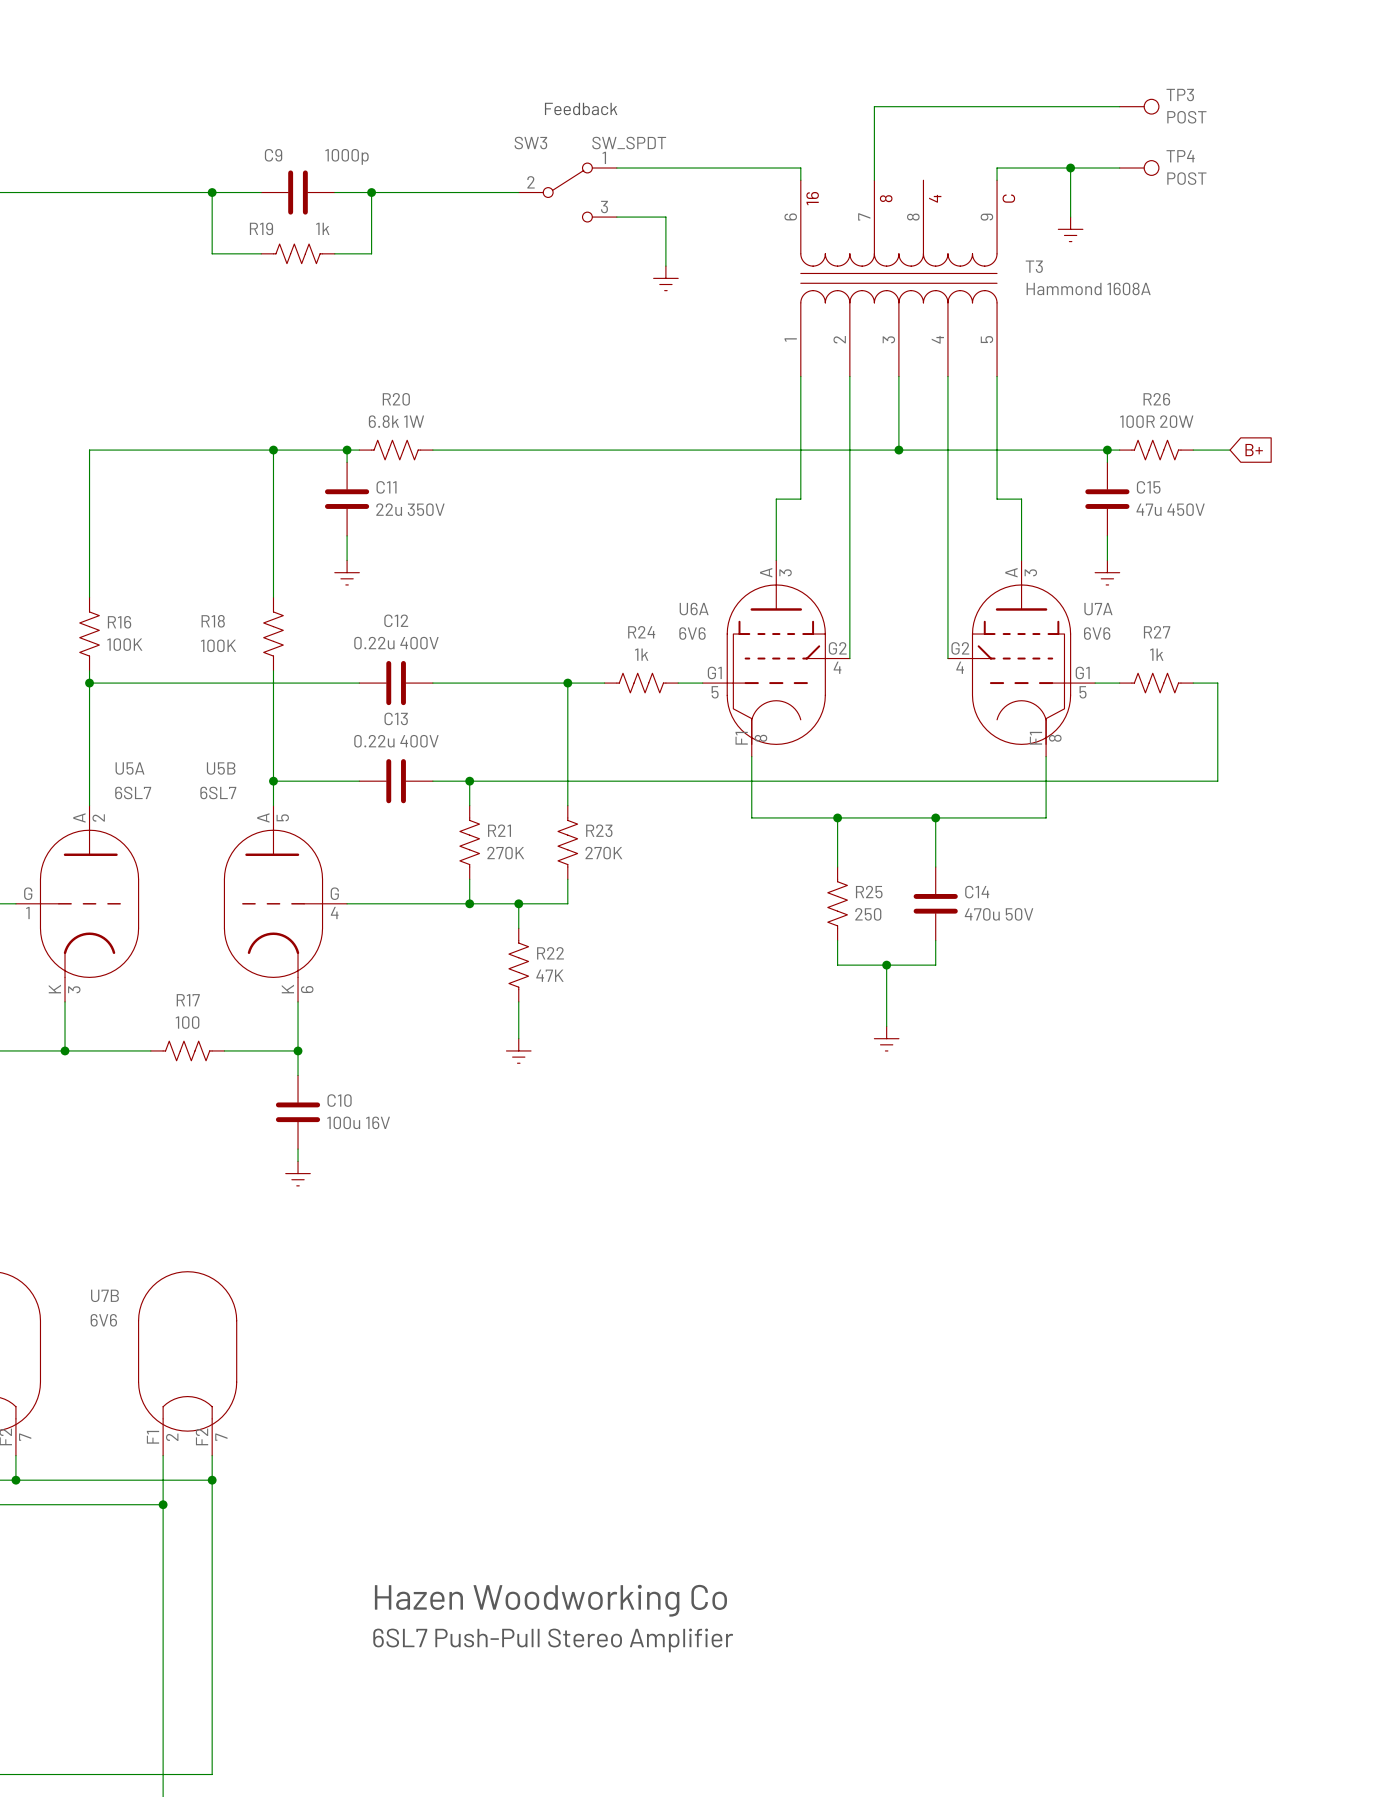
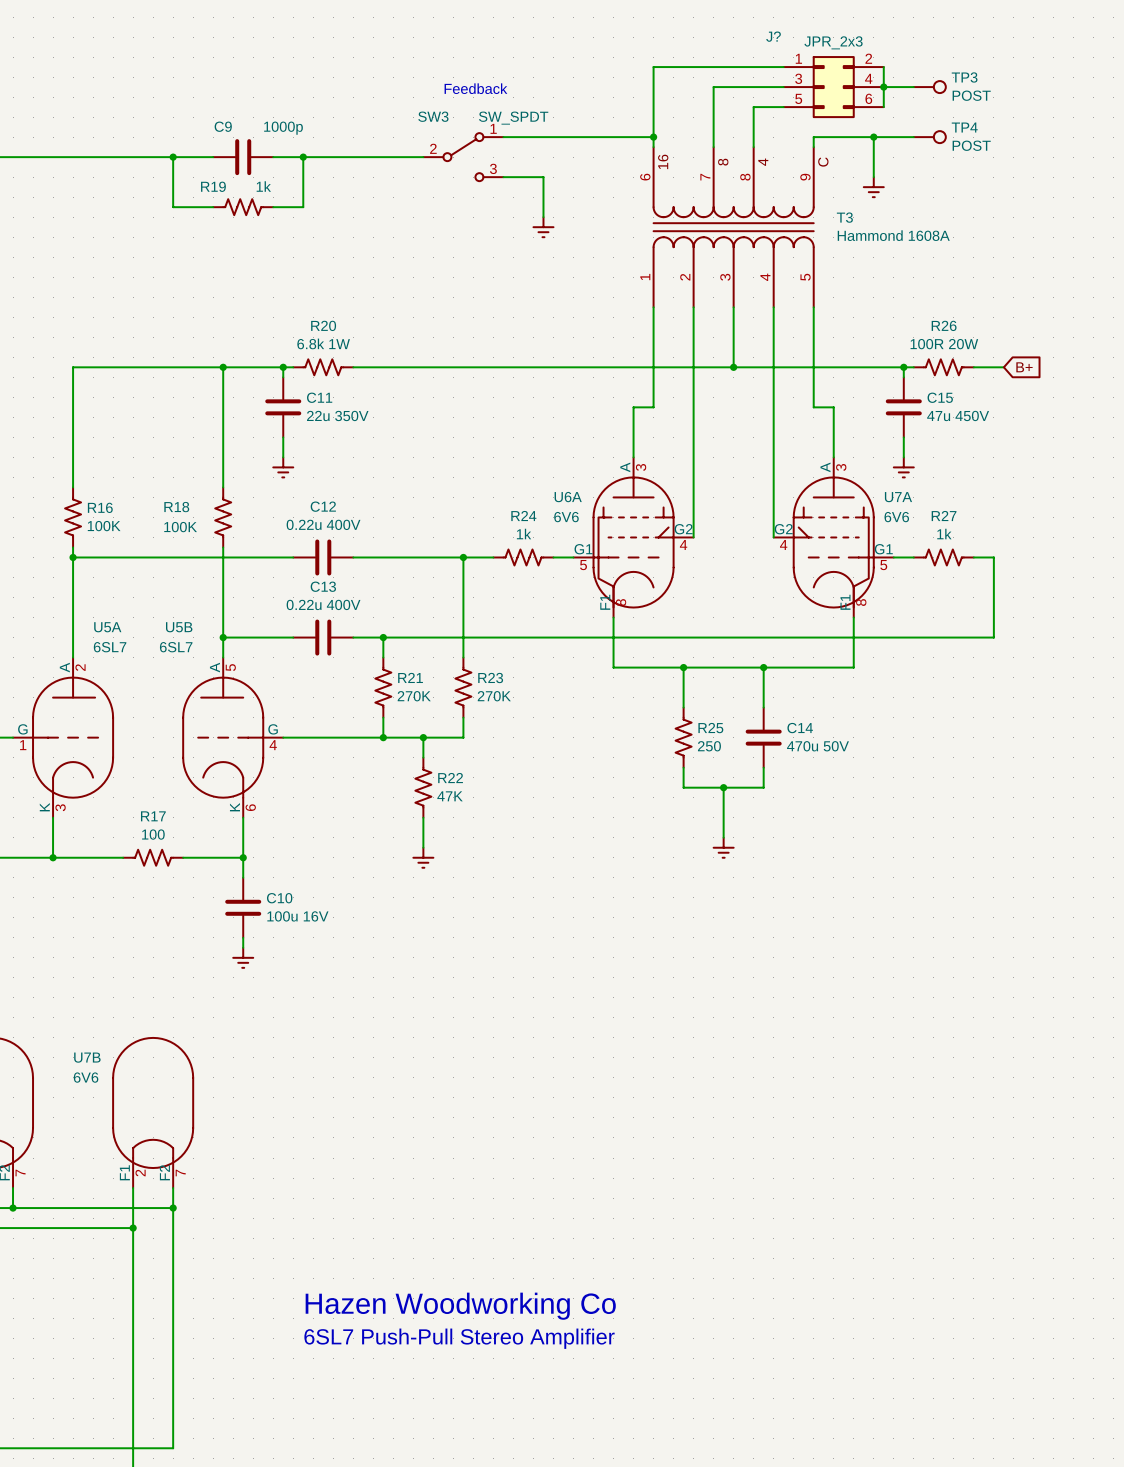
wire: none -> (783, 67) (653, 67) (653, 137)
wire: none -> (883, 67) (883, 107)
J?: none -> JPR_2x3 (833, 87)
junction: none -> (883, 87)
wire: none -> (783, 107) (753, 107) (753, 147)
junction: none -> (653, 137)

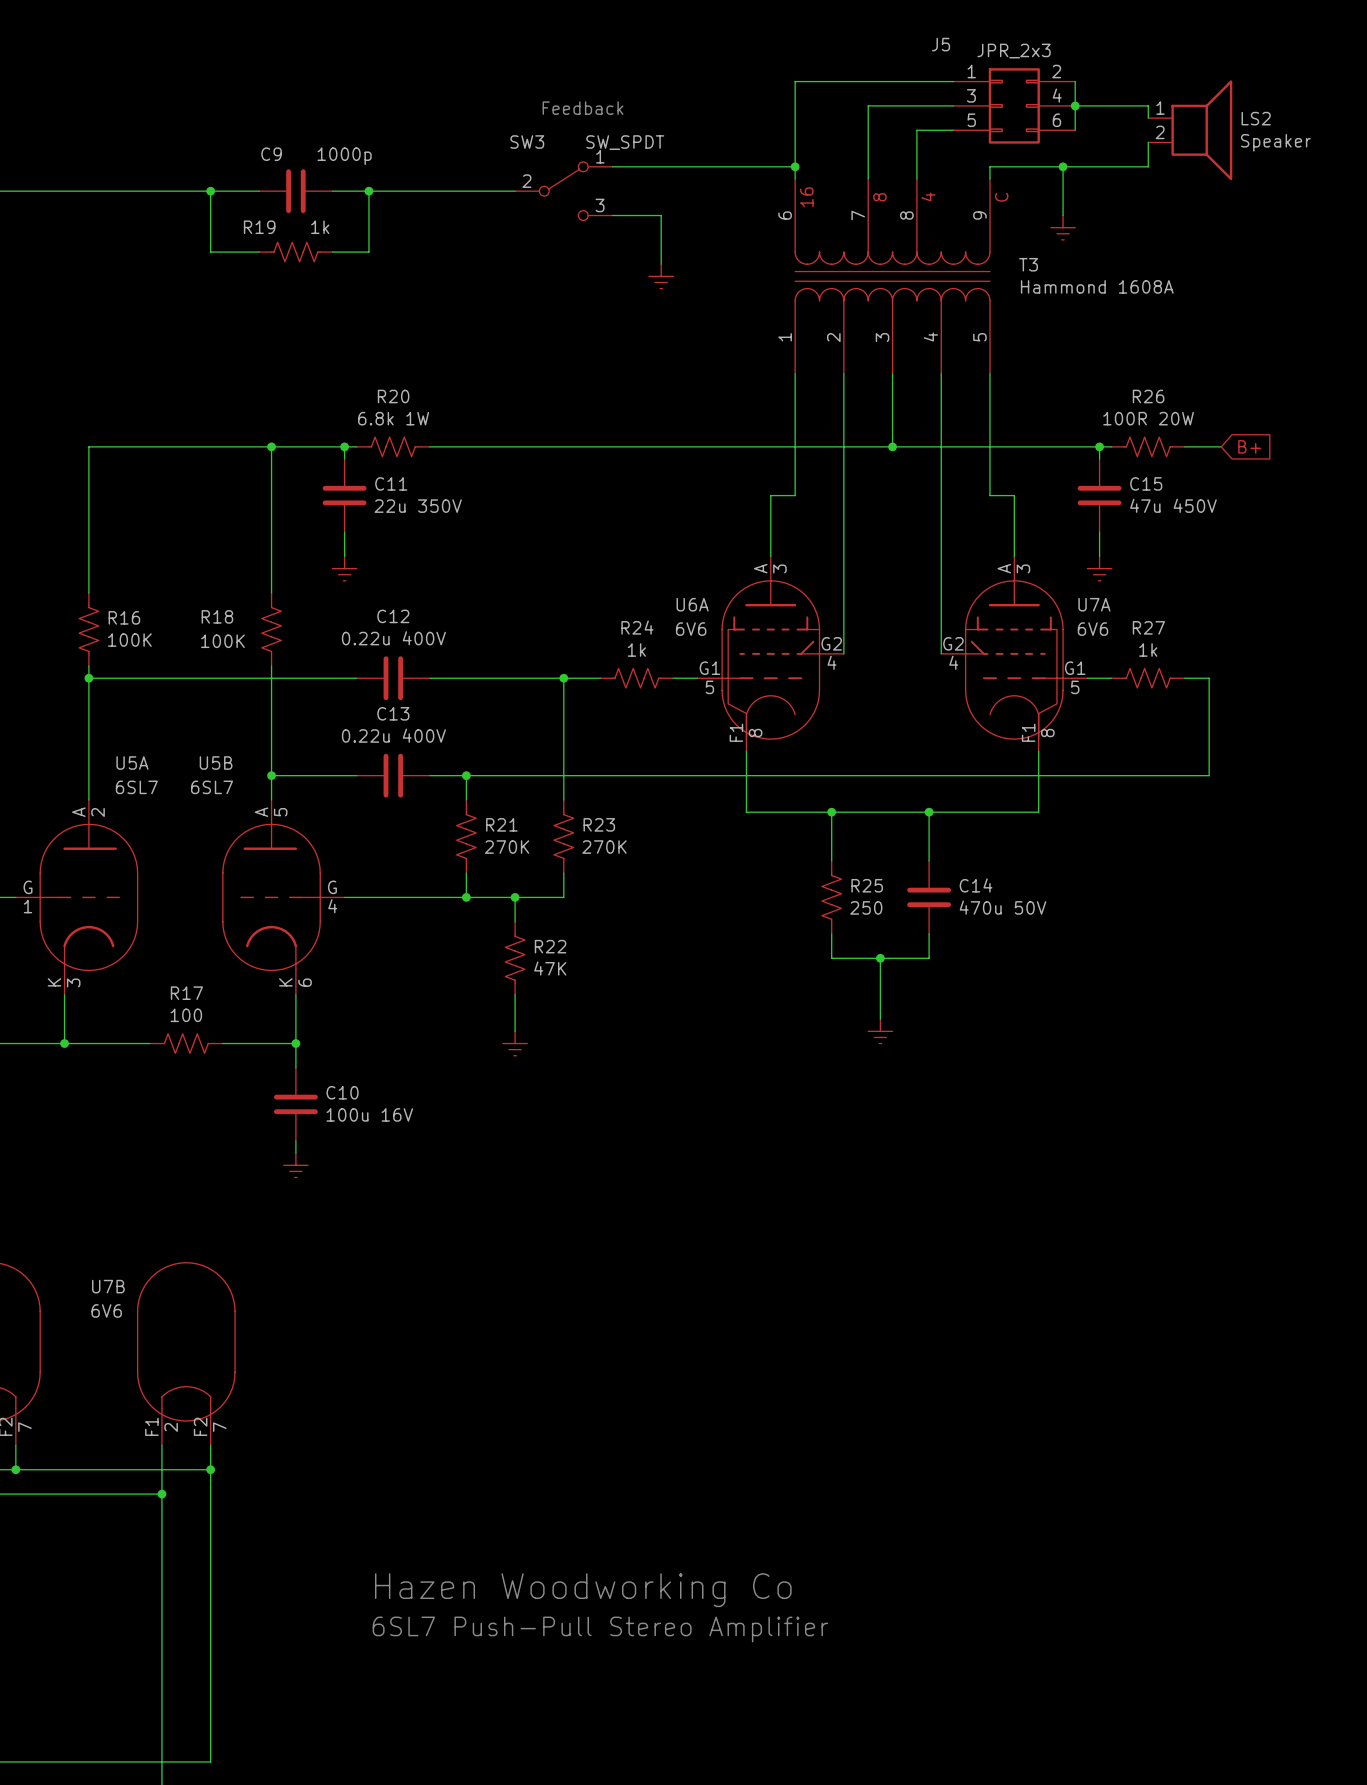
J? name: J? (773, 36) -> J5 (940, 44)
wire: none -> (1111, 105) (1148, 105) (1148, 118)
TP3: POST (929, 87) -> none
LS2: none -> Speaker (1190, 130)
wire: none -> (1148, 142) (1148, 166) (1111, 166)
TP4: POST (929, 137) -> none

